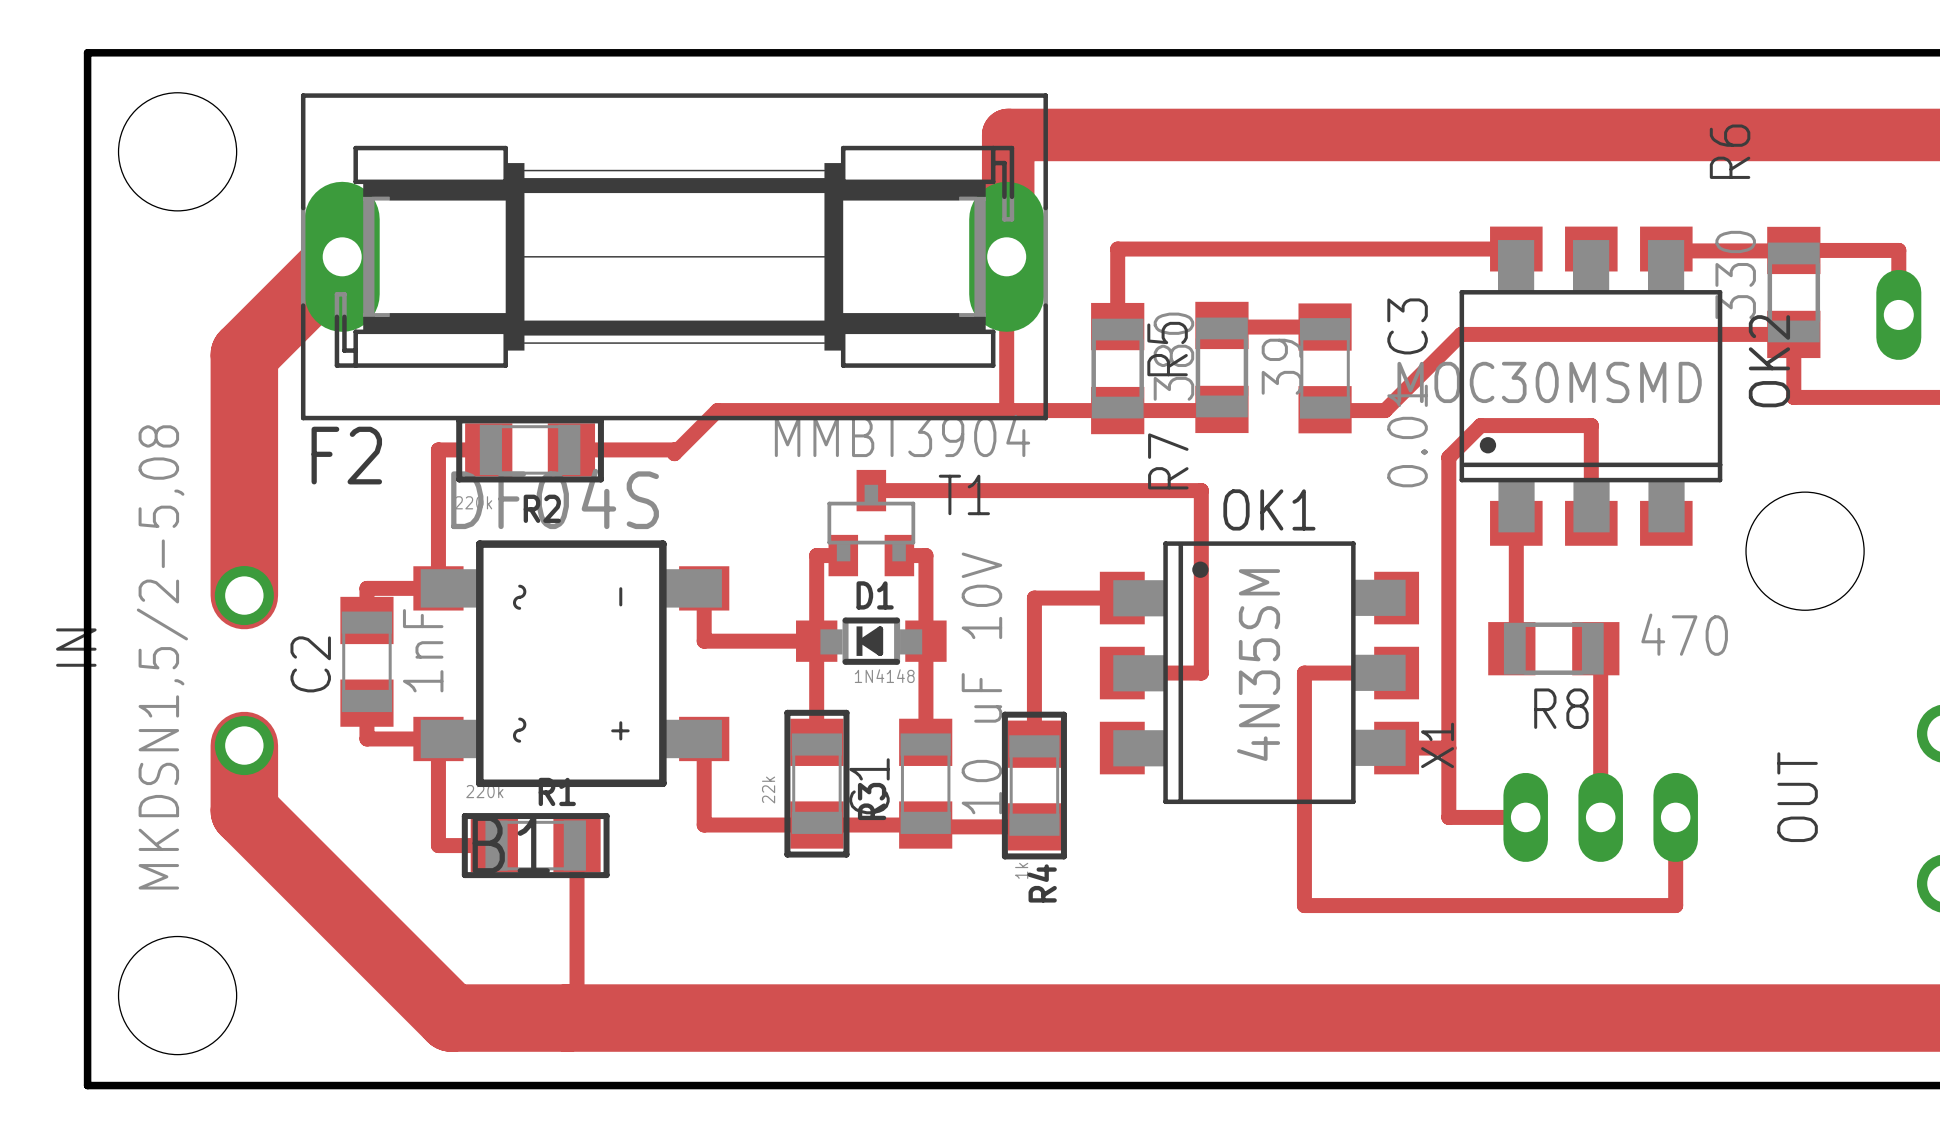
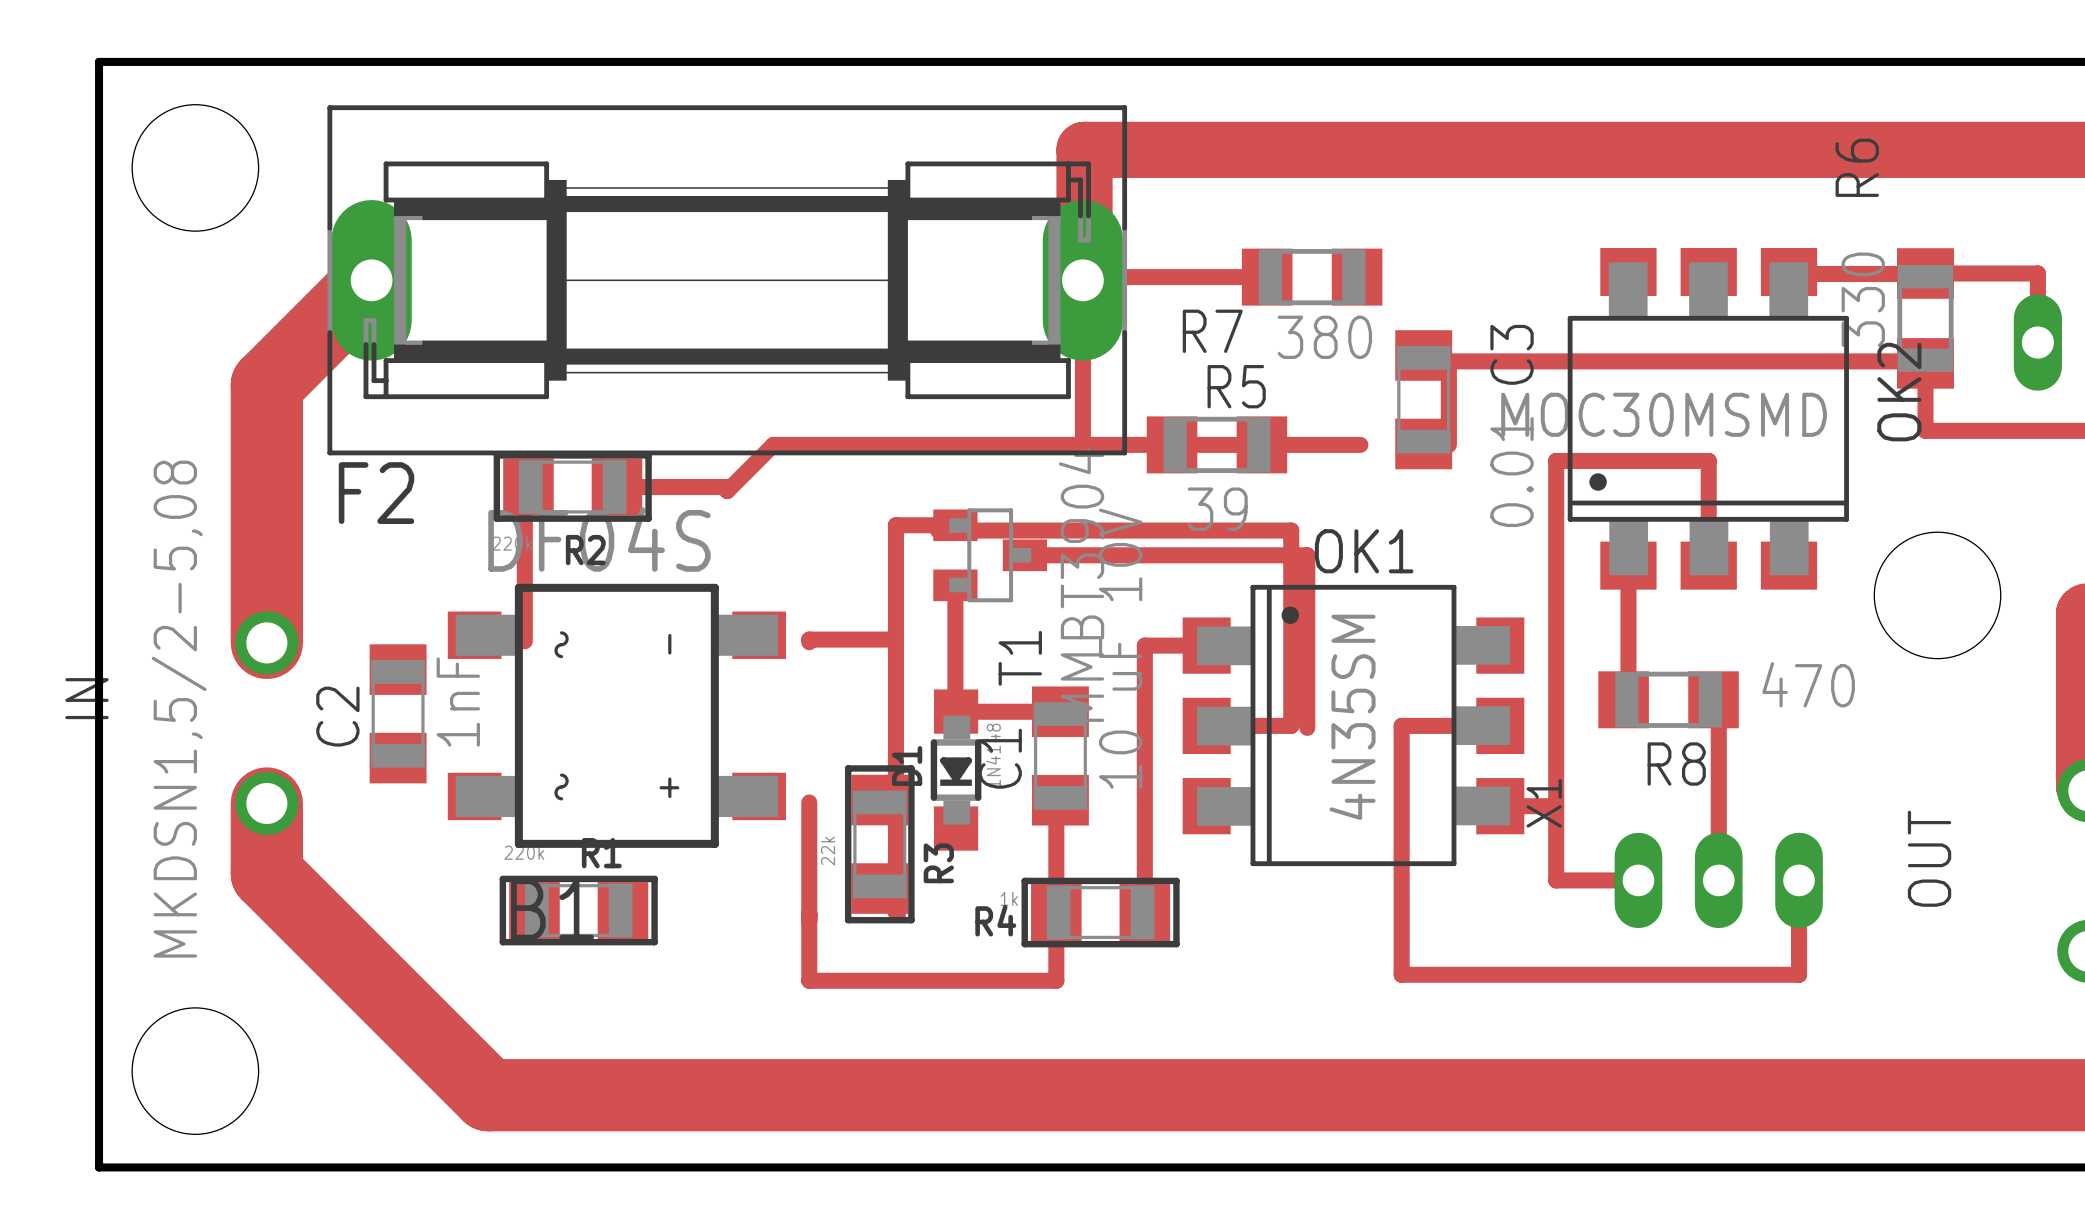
track: (1516, 249) (1117, 249) (1117, 326) -> none
track: none -> (1267, 277) (1082, 277) (1082, 279)
track: (1221, 325) (1223, 327) (1325, 327) -> none
track: none -> (1925, 361) (1448, 361) (1448, 444)
track: (1793, 334) (1461, 334) (1385, 410) (1325, 409) -> none
R5 rotation: 0° (1221, 367) -> 90° clockwise (1216, 444)
R5 position: (1221, 367) -> (1216, 444)
R7 rotation: 0° (1117, 368) -> 90° clockwise (1312, 277)
R7 position: (1117, 368) -> (1312, 277)
track: (1480, 425) (1448, 457) -> (1590, 460) (1556, 460) (1556, 495)
track: (488, 449) (438, 449) (438, 588) (438, 586) -> none
track: none -> (526, 491) (524, 491) (524, 641) (524, 639)
track: none -> (955, 525) (895, 525) (895, 912) (897, 914)
track: none -> (1024, 555) (1307, 555) (1307, 727)
T1 rotation: 0° (871, 523) -> 90° clockwise (990, 555)
track: none -> (955, 585) (955, 711) (1060, 711)
track: (843, 555) (816, 555) (816, 742) -> none
track: (899, 555) (925, 555) (925, 742) -> none
track: (704, 586) (704, 641) (816, 641) -> none
track: (440, 588) (366, 588) (366, 620) -> none
track: none -> (895, 639) (809, 639) (809, 642)
track: (1064, 598) (1034, 598) (1034, 744) -> (1144, 645) (1144, 912)
D1 rotation: 0° (871, 641) -> 90° counterclockwise (956, 770)
track: (368, 691) (366, 738) (438, 738) -> none
track: (438, 738) (438, 845) (494, 845) -> none
track: (704, 738) (704, 825) (1034, 826) -> none
track: none -> (1060, 800) (1056, 800) (1056, 980) (809, 980) (809, 802)
C1 position: (925, 783) -> (1060, 755)
R4 rotation: 0° (1034, 785) -> 90° clockwise (1100, 912)
track: (577, 845) (577, 1018) -> none

